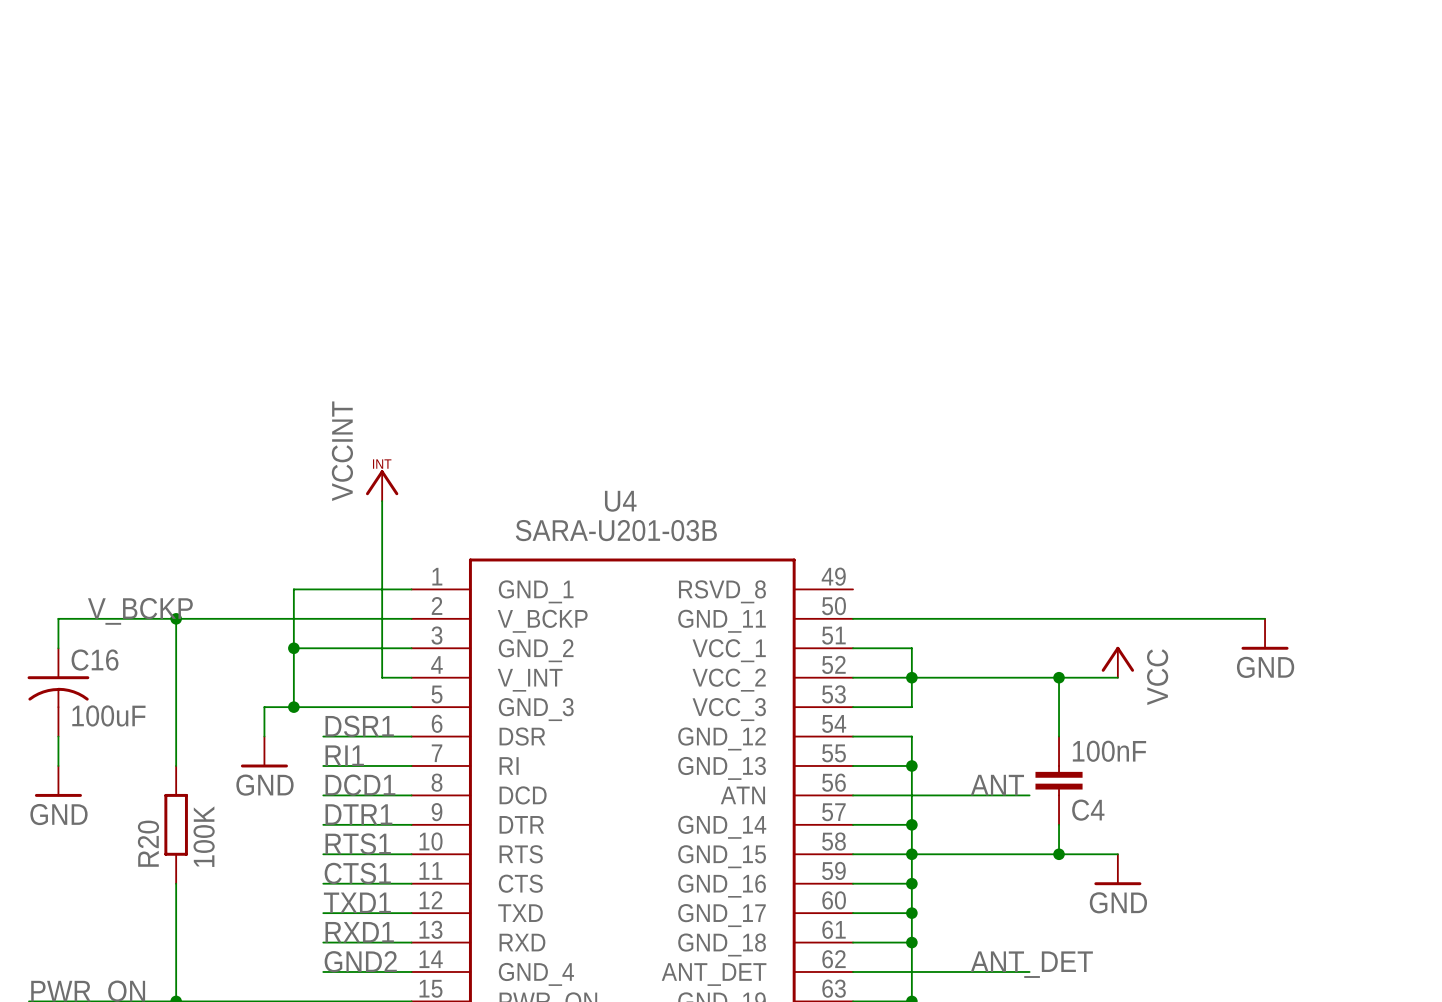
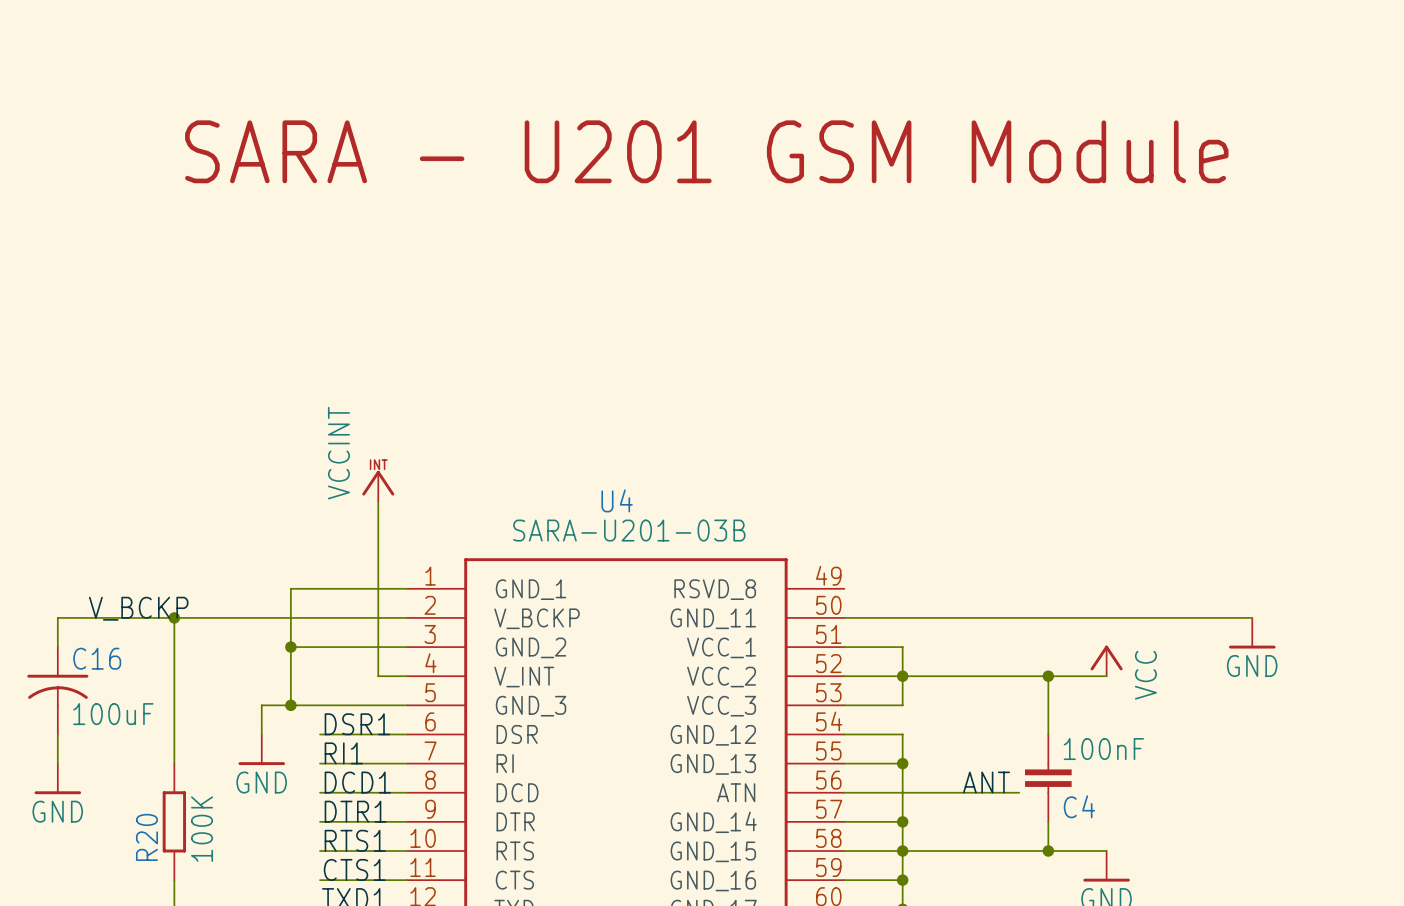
text: none -> SARA - U201 GSM Module (706, 151)

